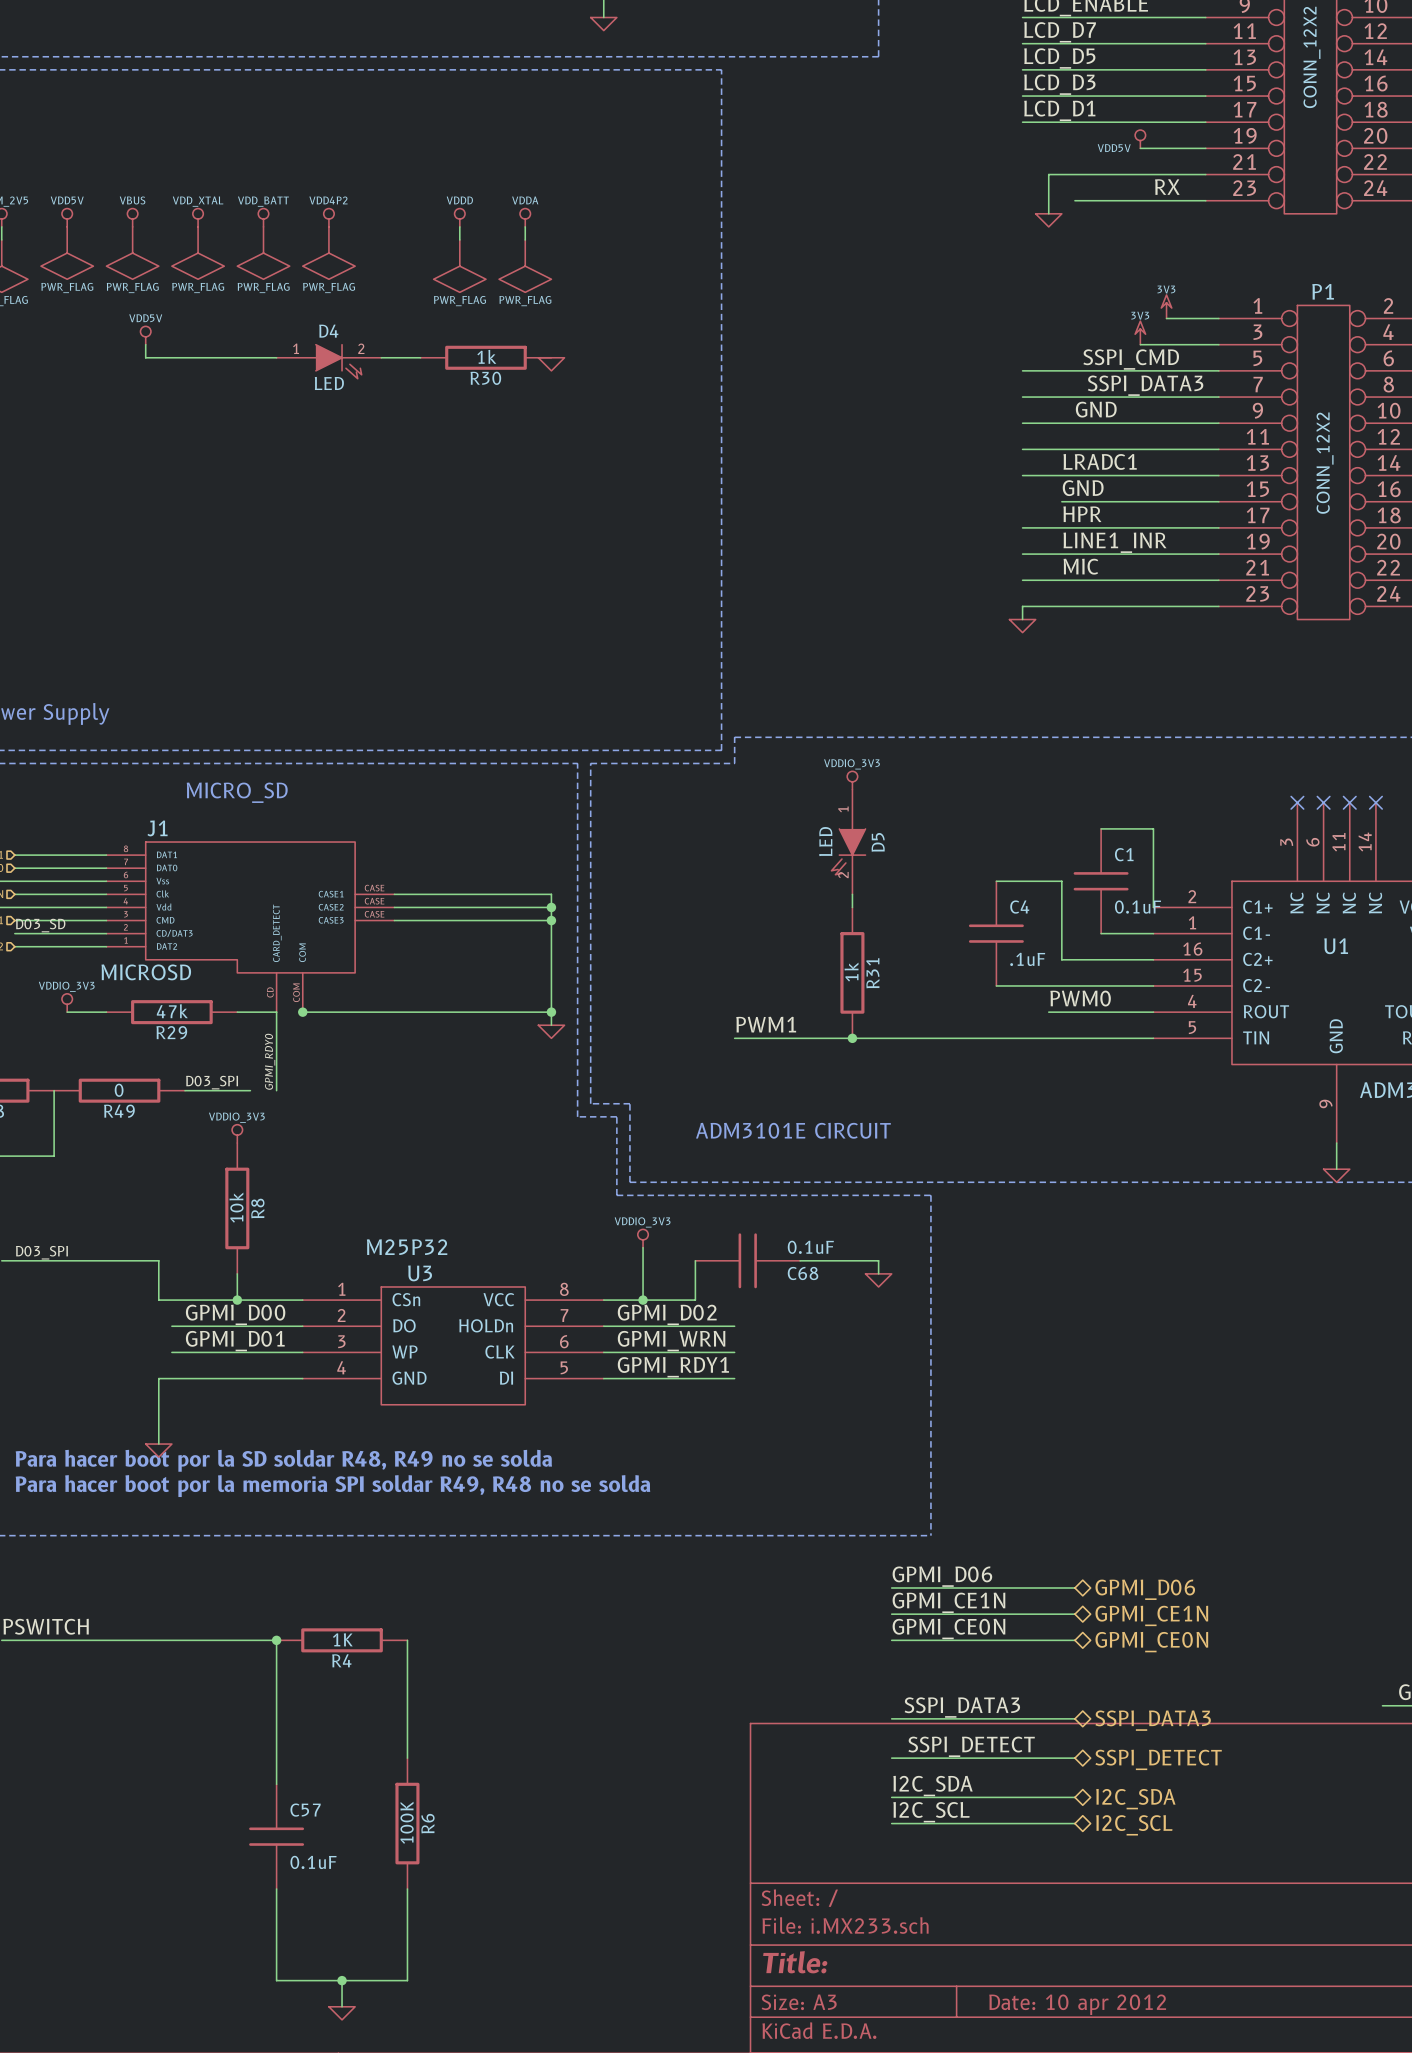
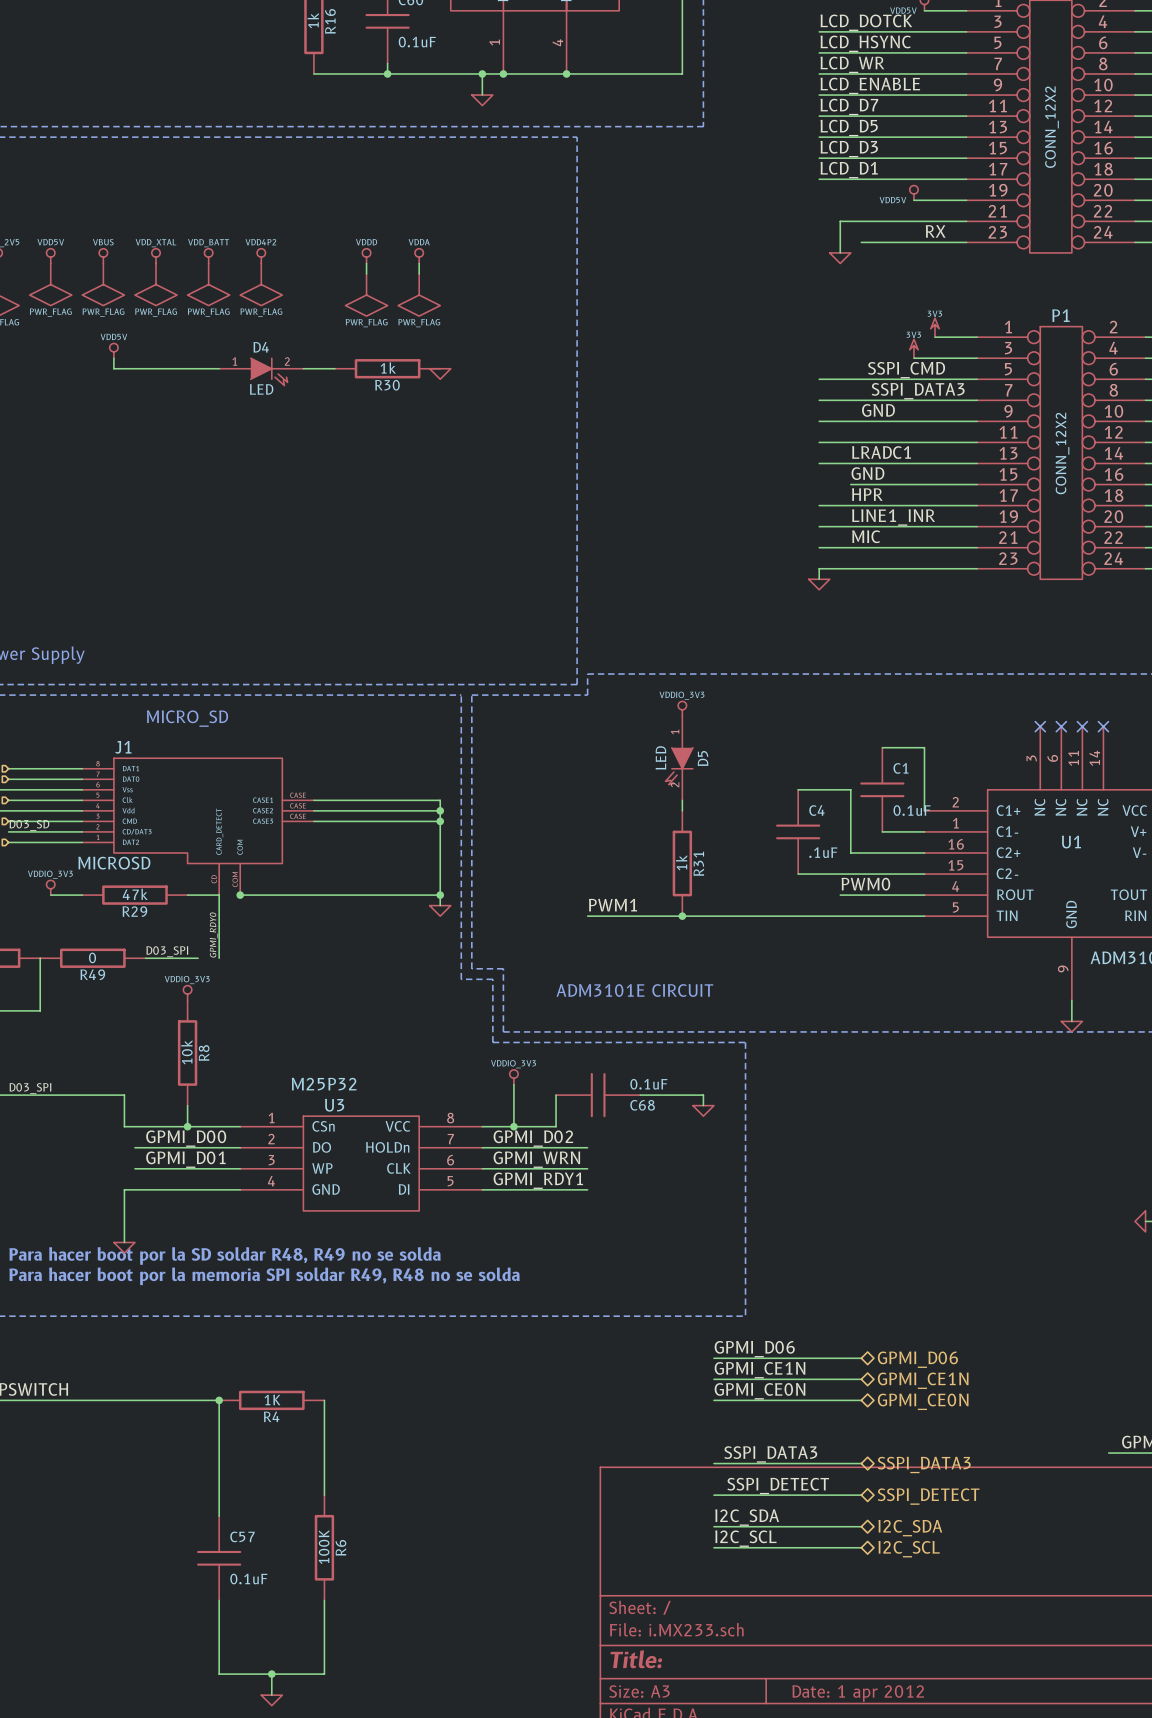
title block: Date: 10 apr 2012 (1077, 2004) -> Date: 1 apr 2012 (858, 1693)

